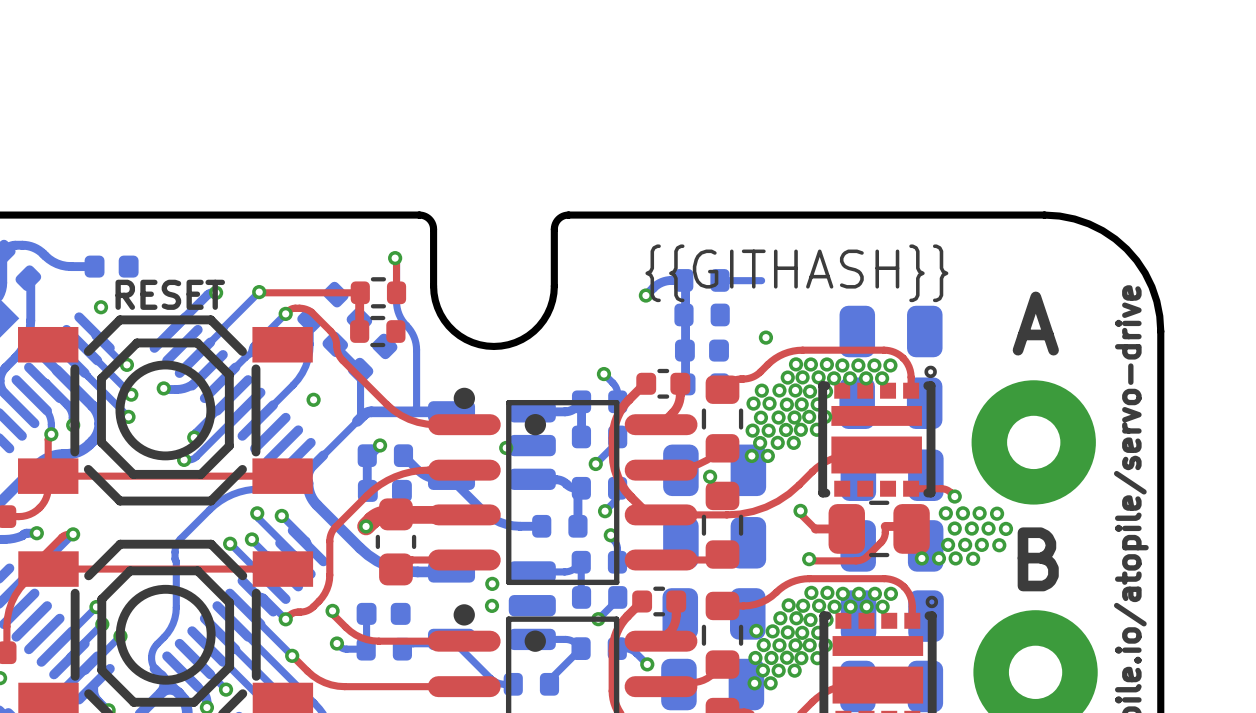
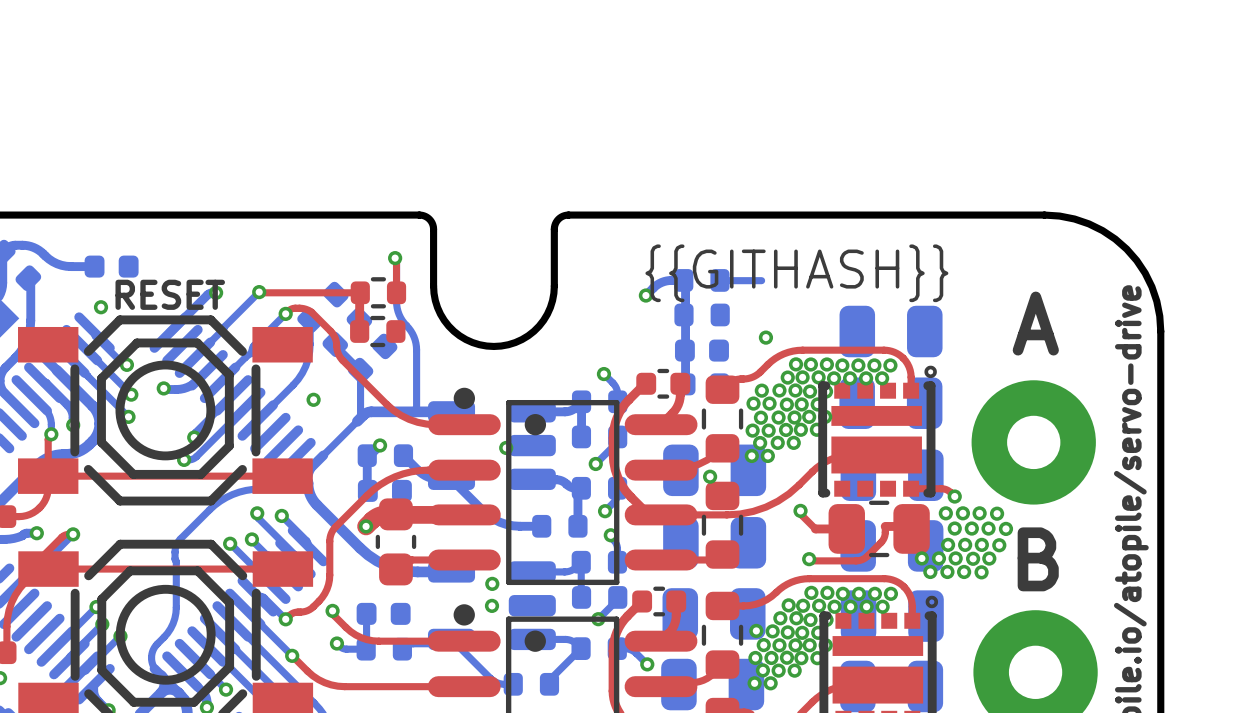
via: none -> (989, 558)
via: none -> (930, 571)
via: none -> (947, 571)
via: none -> (964, 571)
via: none -> (981, 572)

